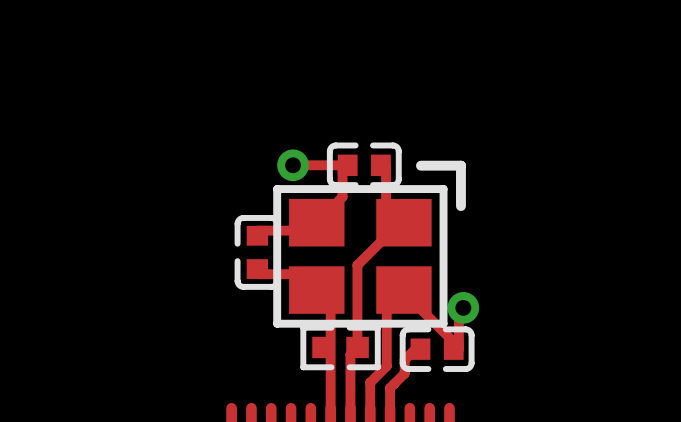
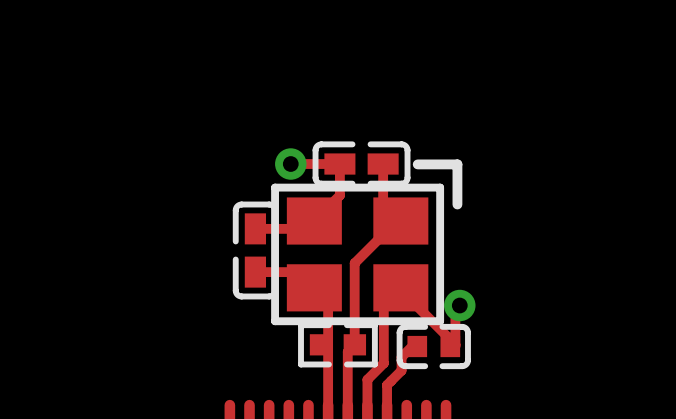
part footprint: [326, 142, 402, 189] -> [312, 141, 411, 187]
part footprint: [234, 214, 281, 290] -> [232, 201, 279, 300]

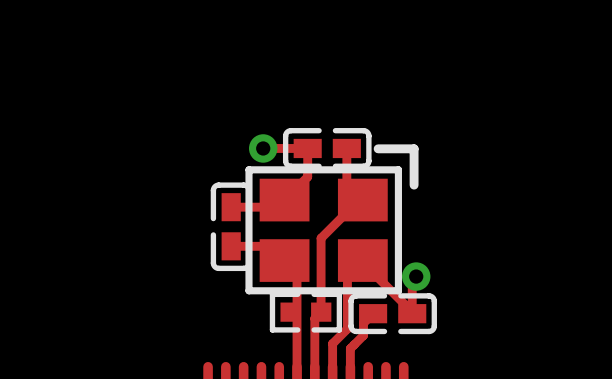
part footprint: [396, 323, 471, 370] -> [348, 293, 437, 335]

